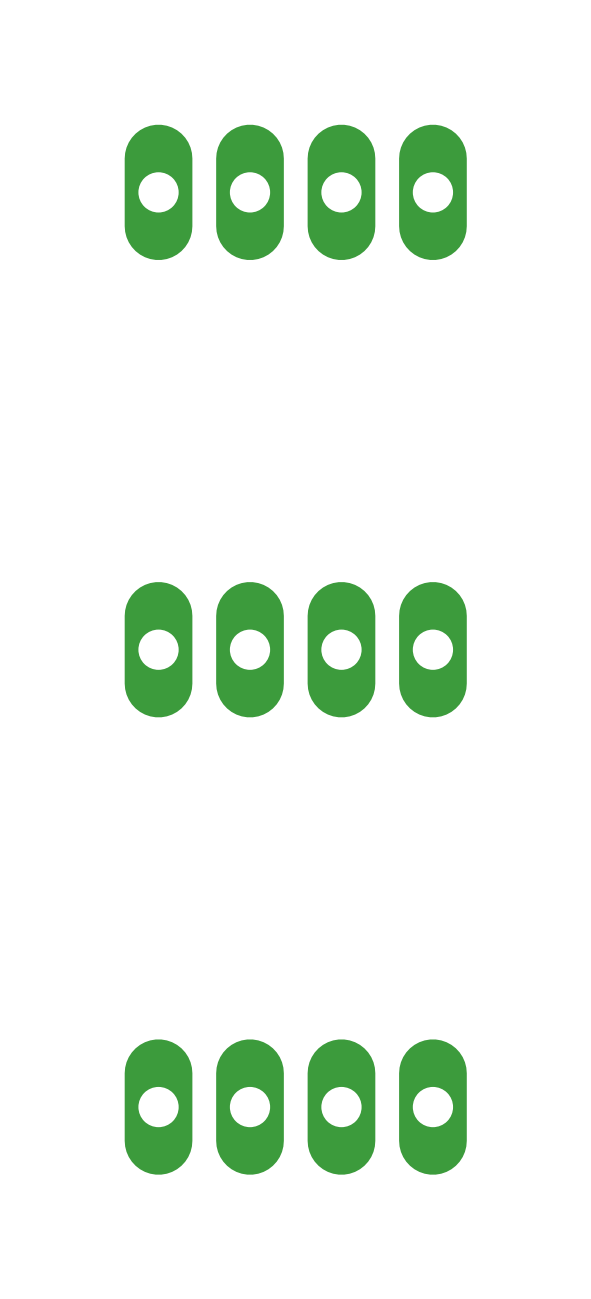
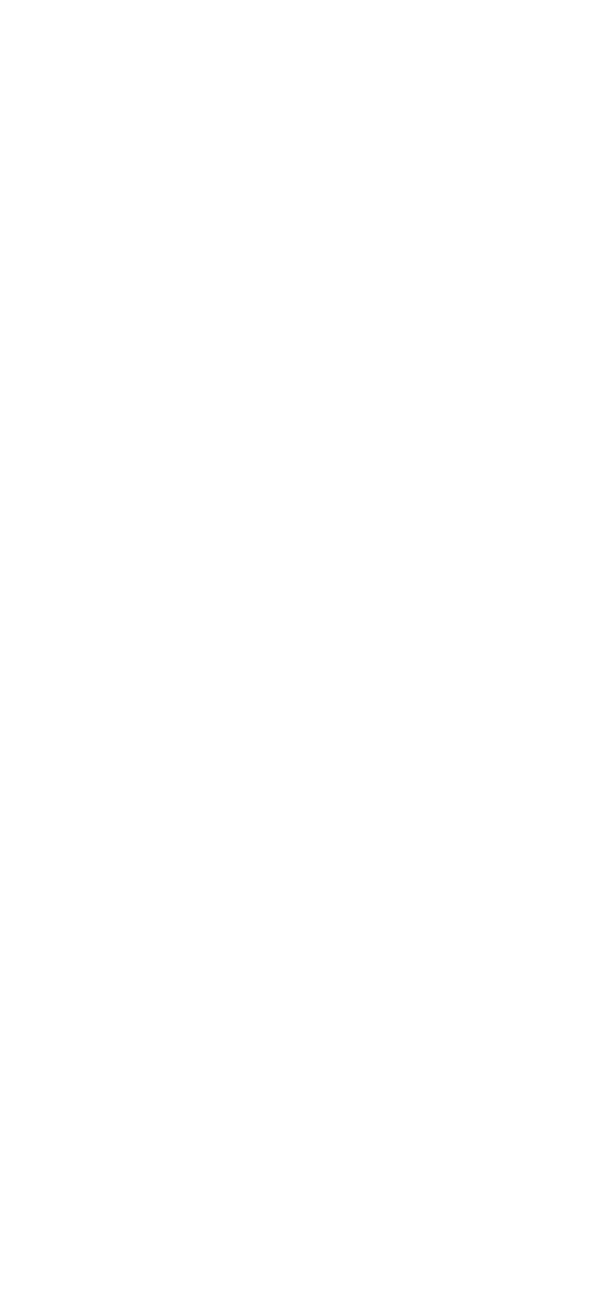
part: (295, 192) -> none
part: (295, 649) -> none
part: (295, 1107) -> none

